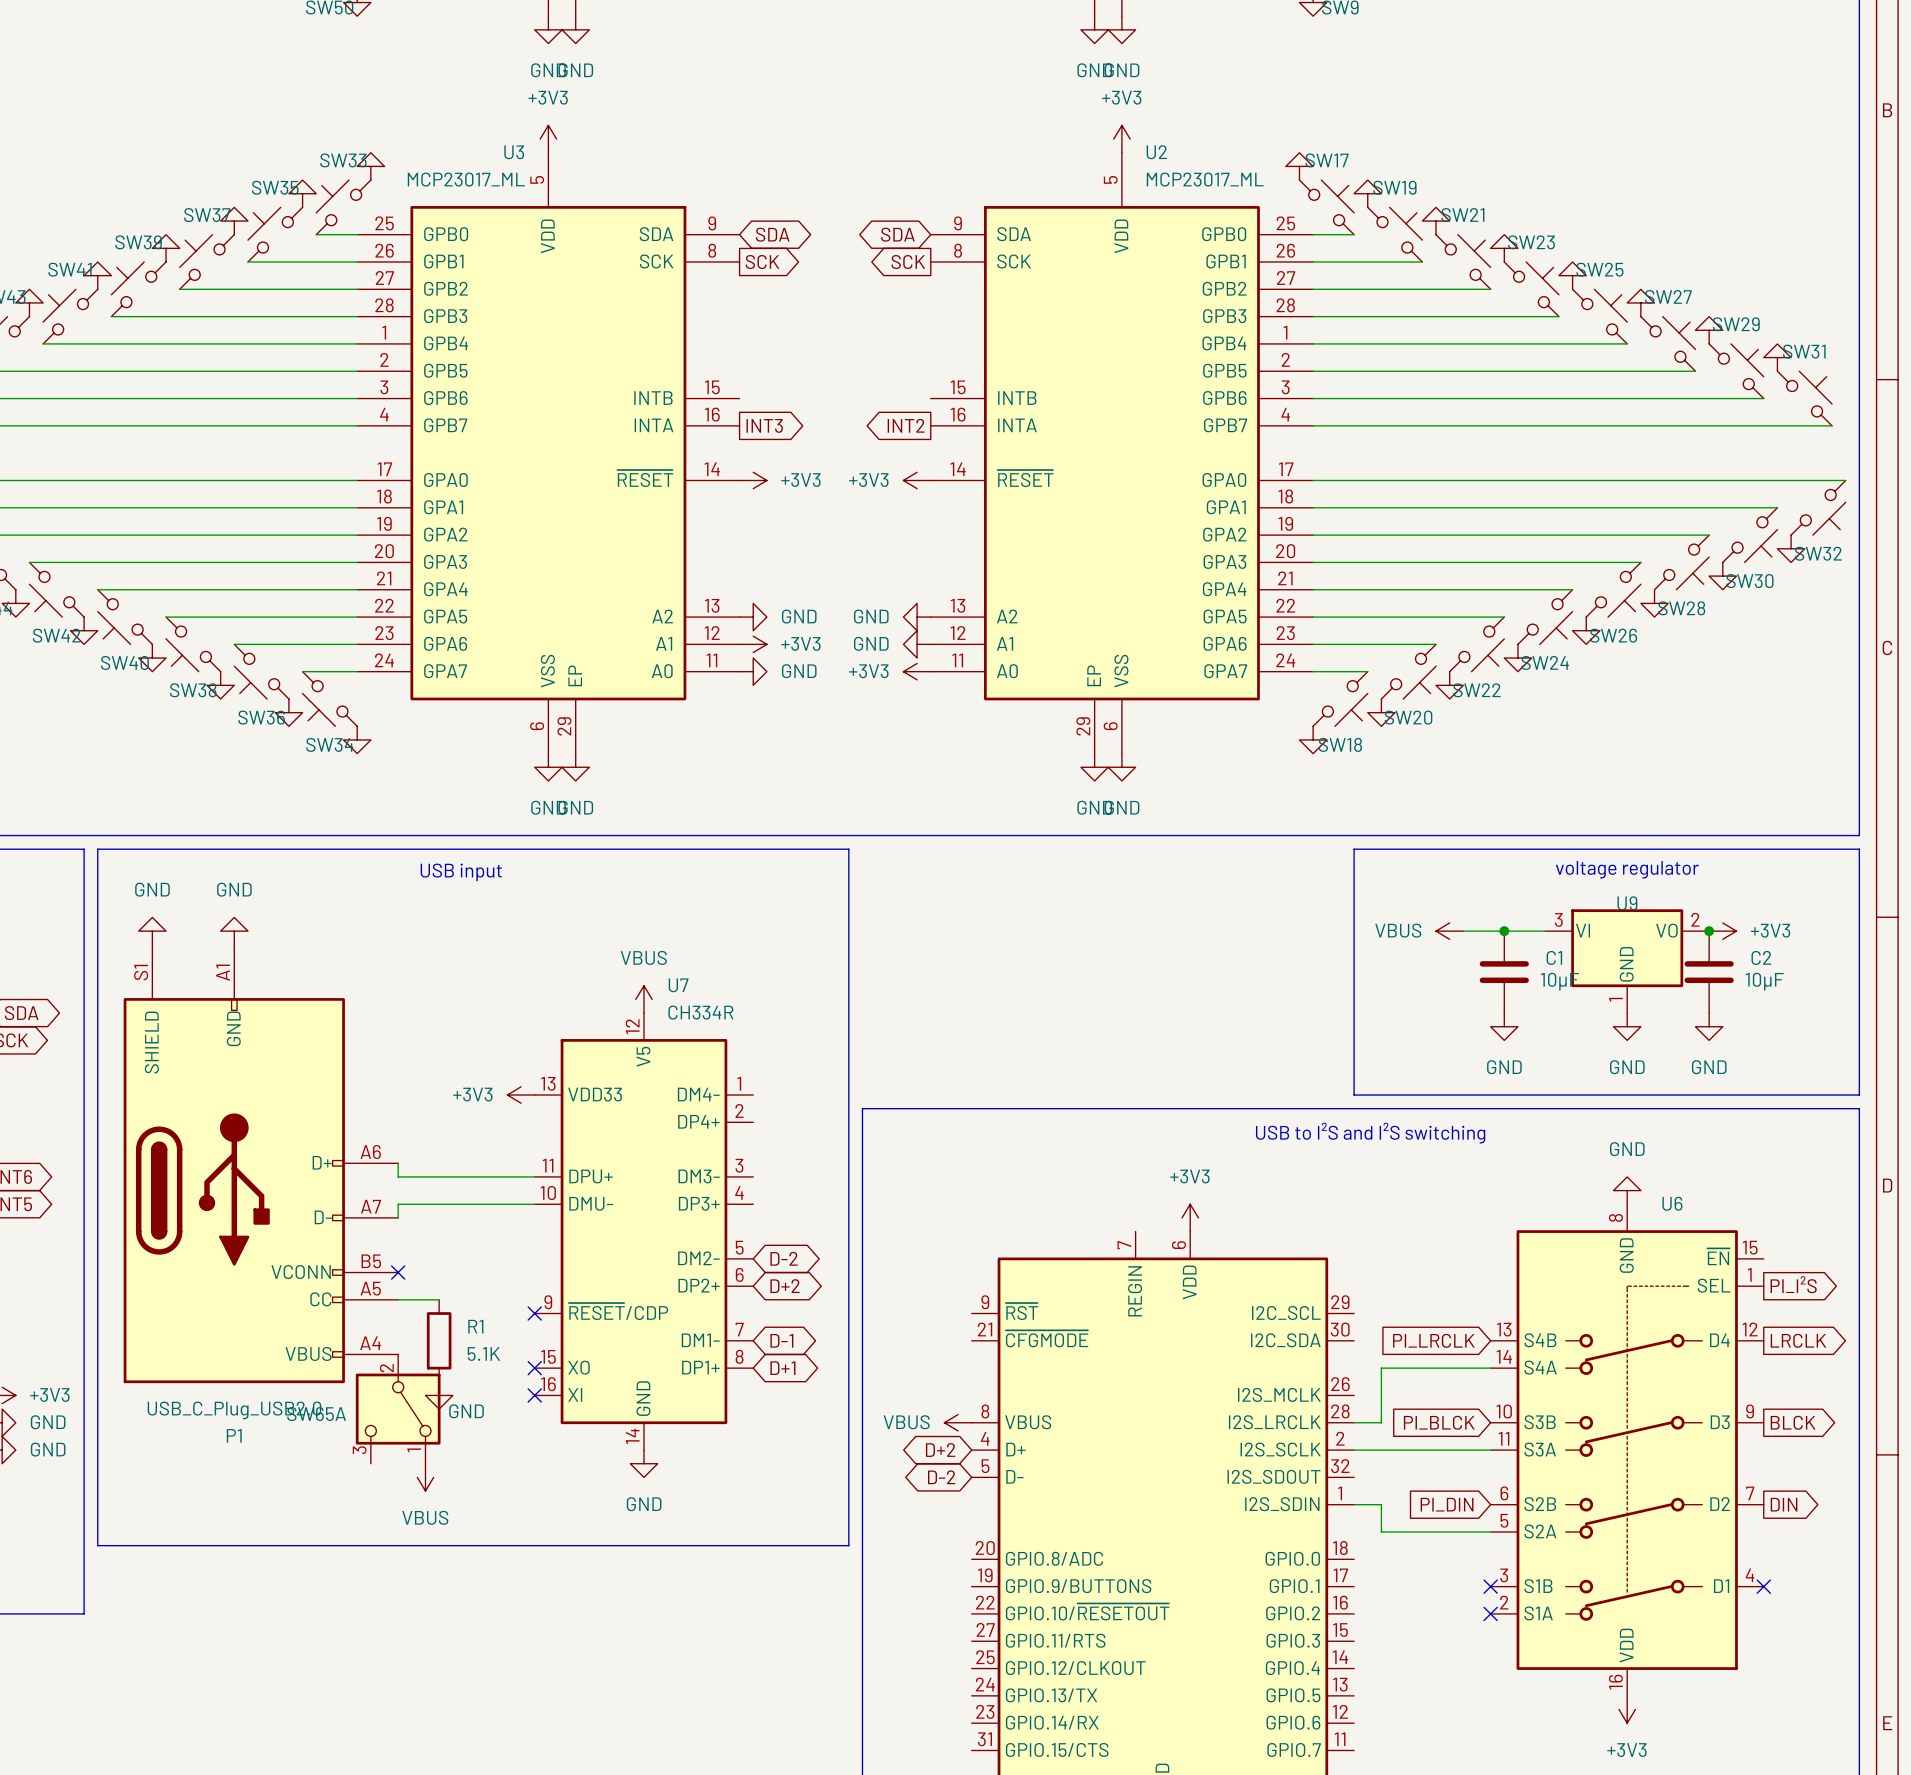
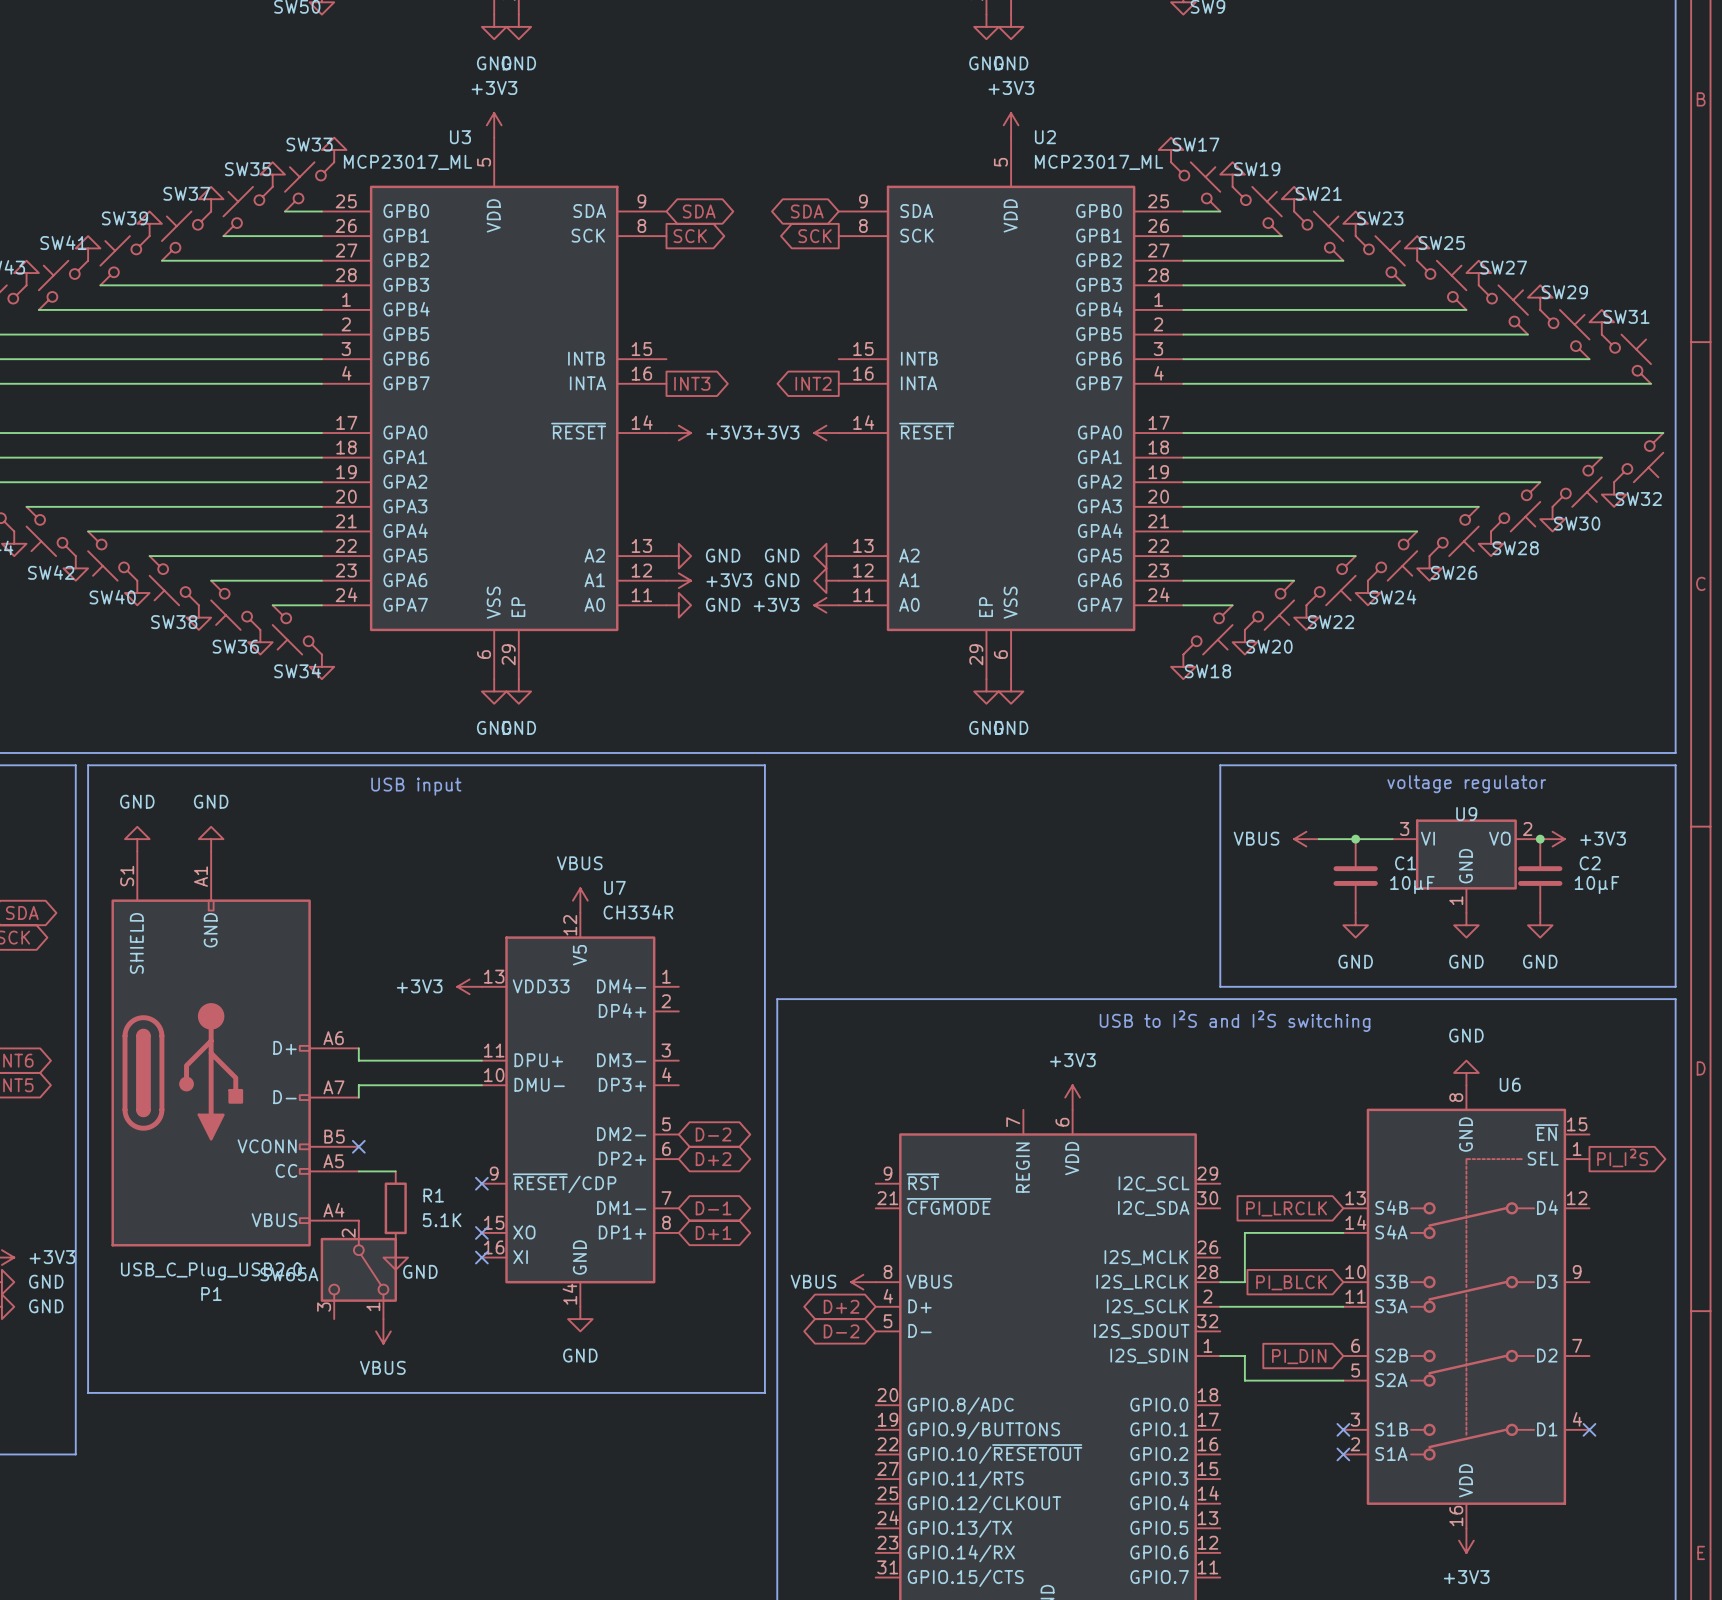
global label: LRCLK (1798, 1340) -> none
global label: BLCK (1793, 1422) -> none
global label: DIN (1784, 1504) -> none

